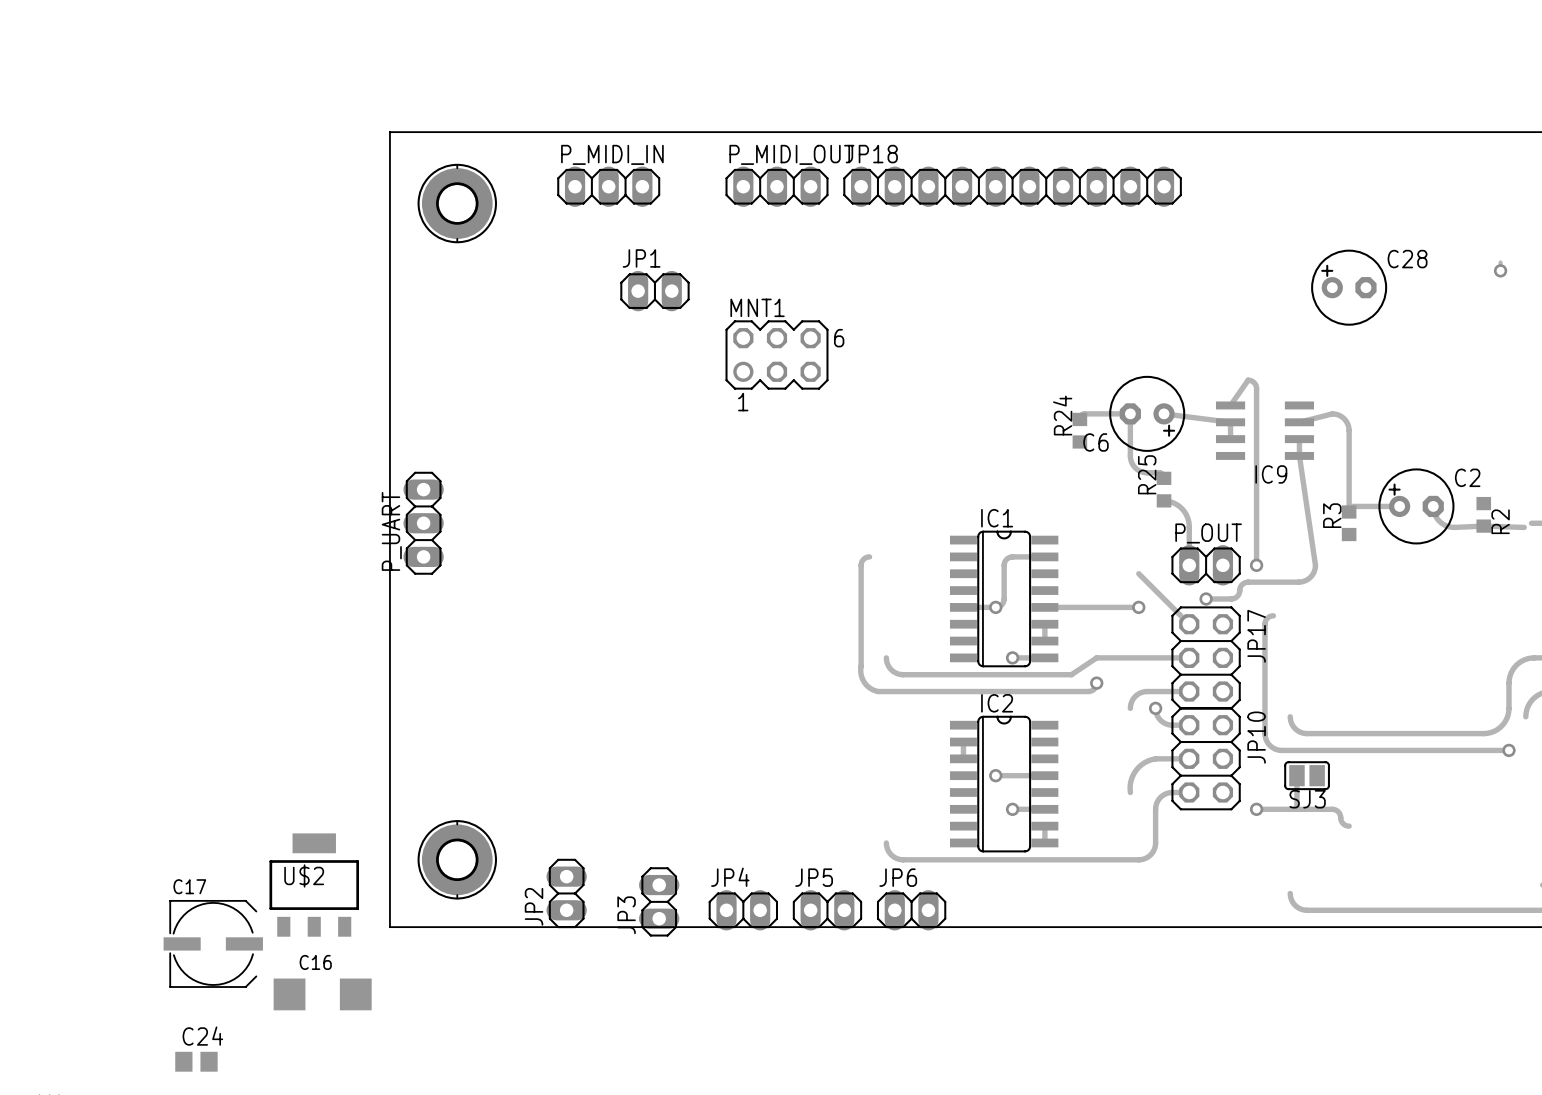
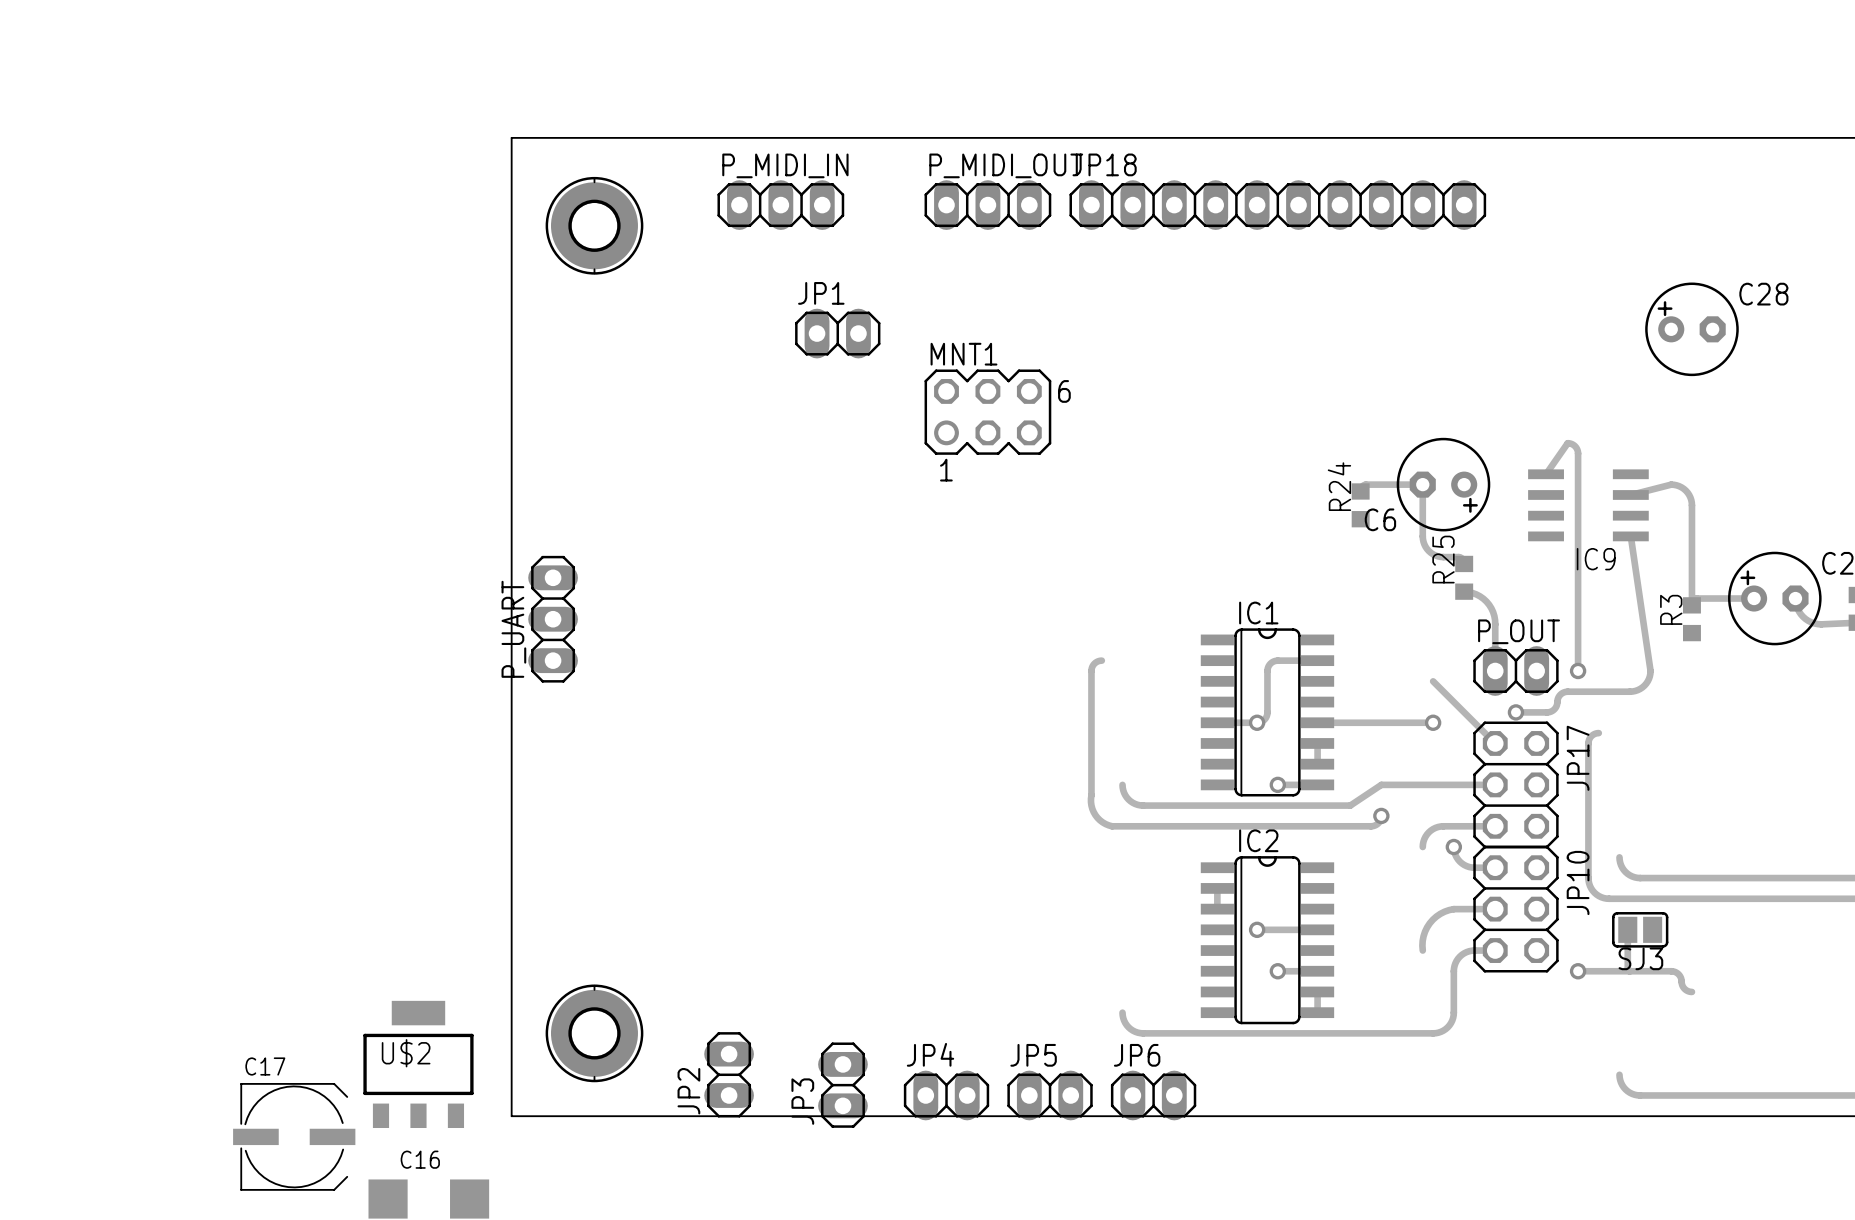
track: (1164, 413) (1230, 422) (1230, 439) -> none
track: (1299, 439) (1299, 455) -> none

